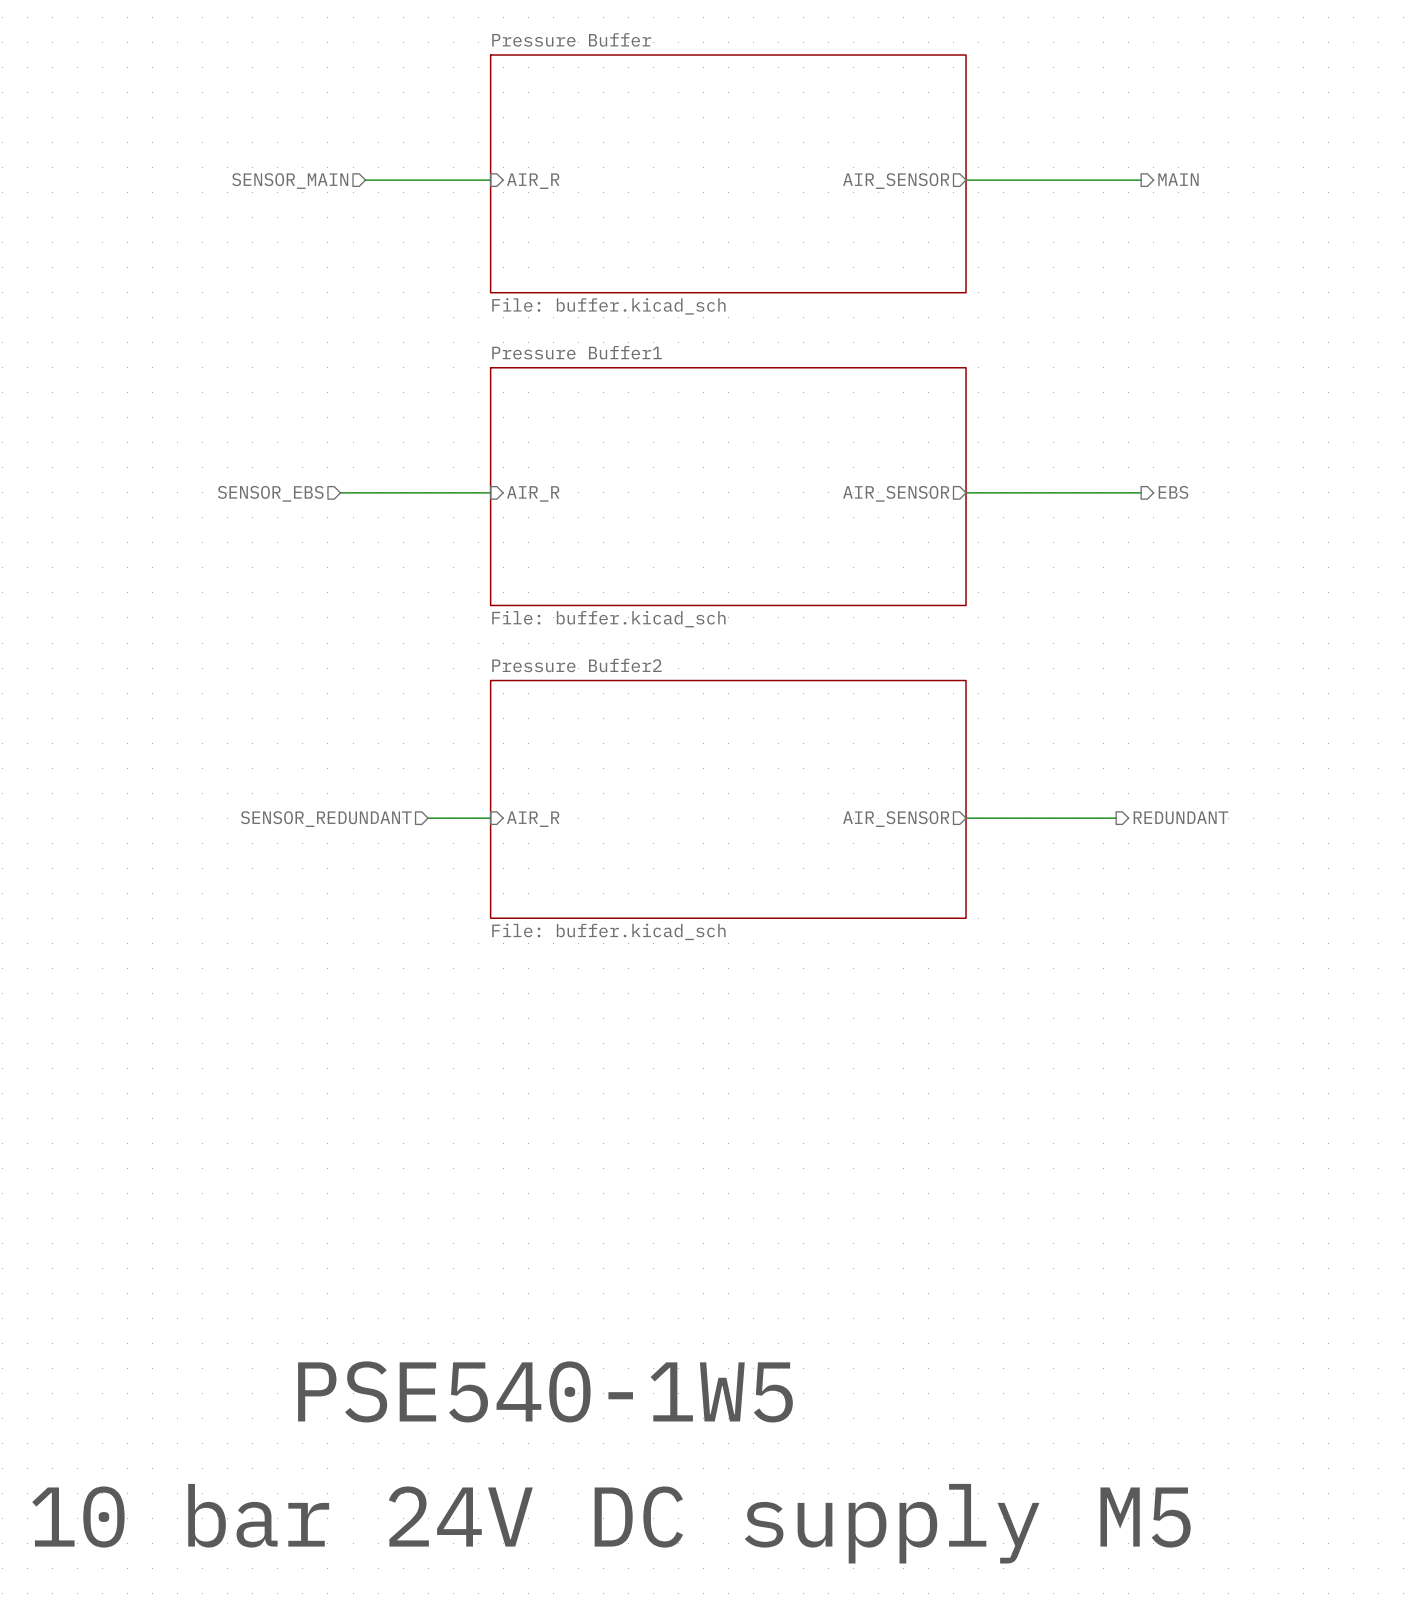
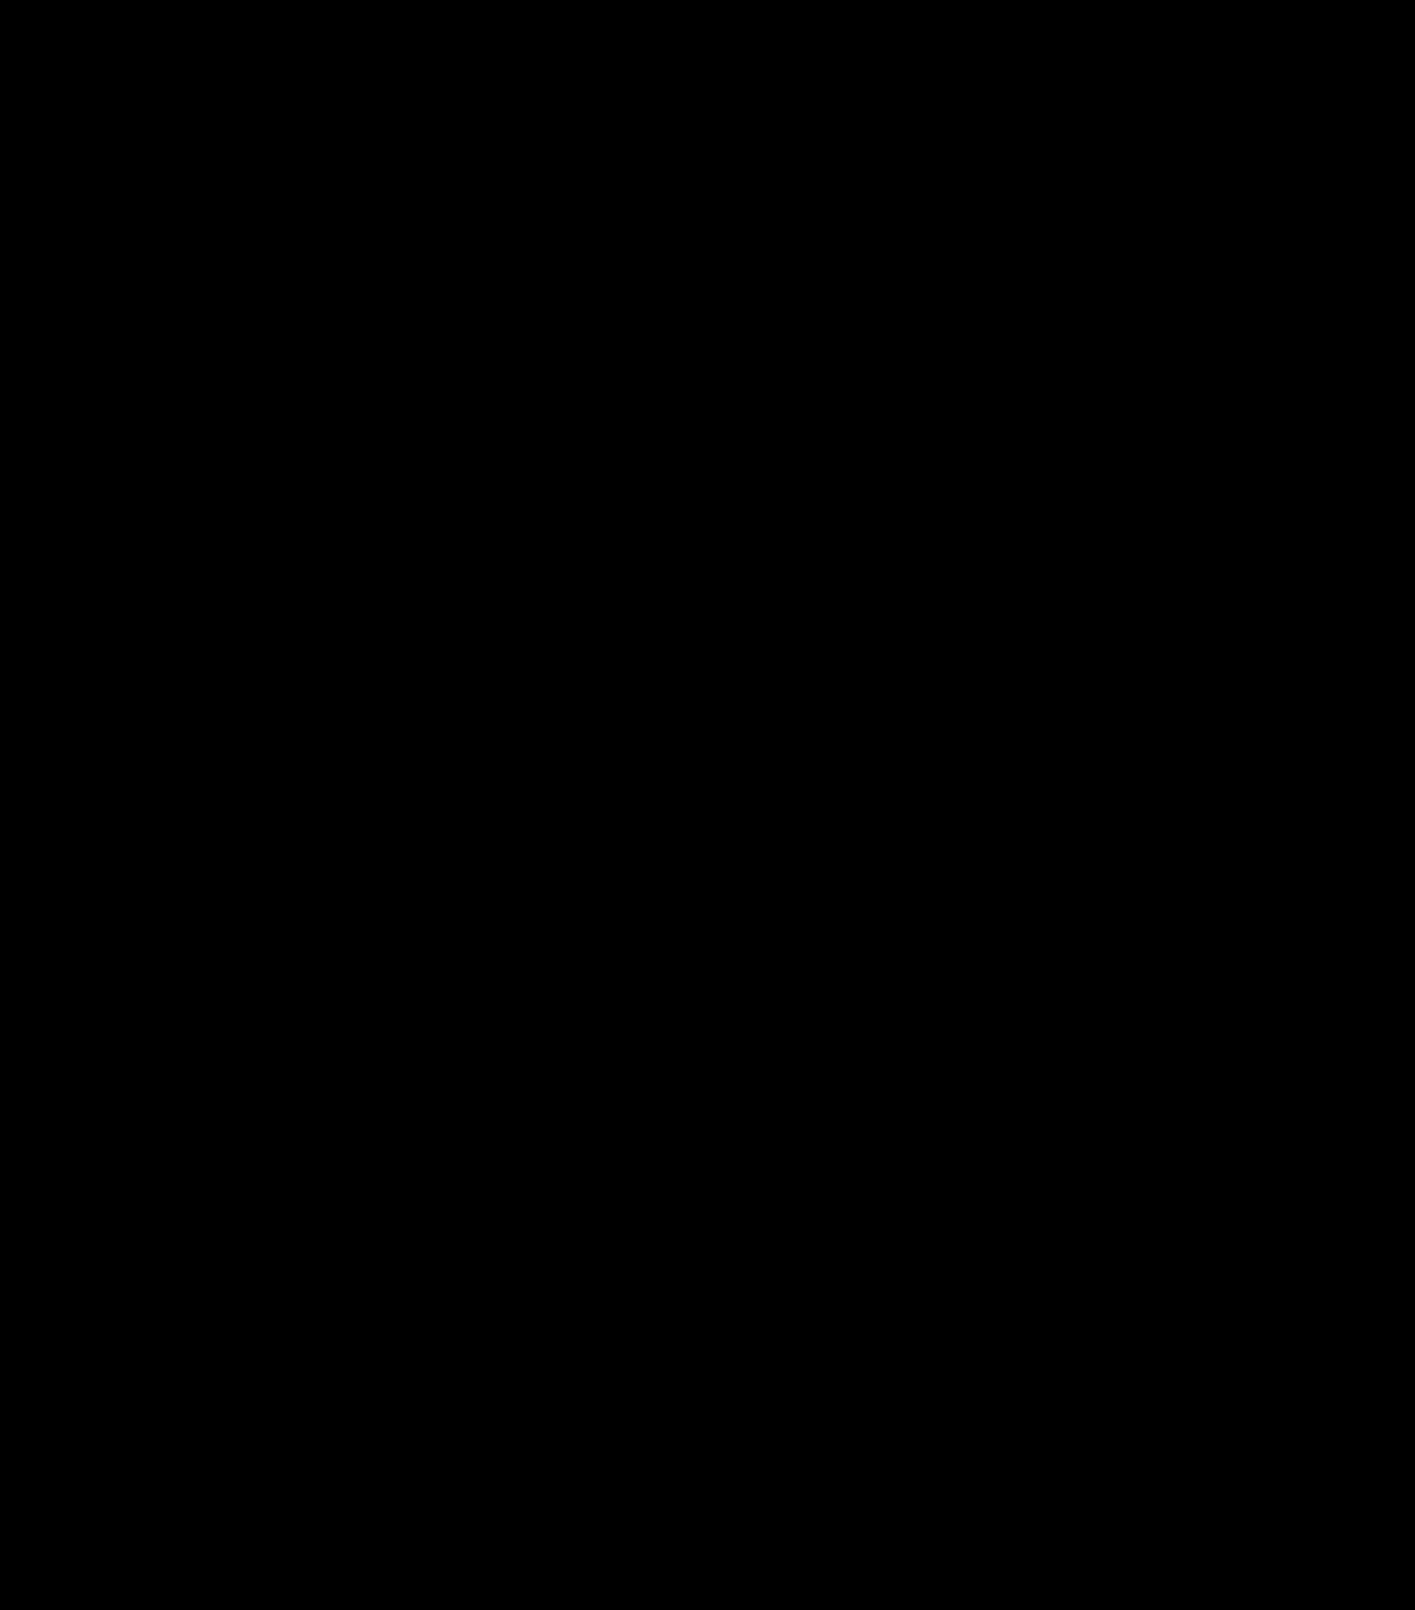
sheet Pressure Buffer: File: buffer.kicad_sch (728, 173) -> none
hierarchical label: MAIN (1178, 179) -> none
wire: (365, 180) (490, 180) -> none
wire: (966, 180) (1141, 180) -> none
hierarchical label: SENSOR_MAIN (290, 181) -> none
sheet pin: AIR_R (533, 181) -> none
sheet pin: AIR_SENSOR (896, 181) -> none
sheet Pressure Buffer1: File: buffer.kicad_sch (728, 486) -> none
wire: (340, 492) (490, 492) -> none
wire: (966, 492) (1141, 492) -> none
hierarchical label: EBS (1173, 492) -> none
hierarchical label: SENSOR_EBS (270, 493) -> none
sheet pin: AIR_R (533, 493) -> none
sheet pin: AIR_SENSOR (896, 493) -> none
sheet Pressure Buffer2: File: buffer.kicad_sch (728, 799) -> none
hierarchical label: REDUNDANT (1181, 817) -> none
wire: (428, 818) (490, 818) -> none
wire: (966, 818) (1116, 818) -> none
hierarchical label: SENSOR_REDUNDANT (326, 819) -> none
sheet pin: AIR_R (533, 819) -> none
sheet pin: AIR_SENSOR (896, 819) -> none
text: PSE540-1W5 (545, 1391) -> none
text: 10 bar 24V DC supply M5 (611, 1523) -> none

